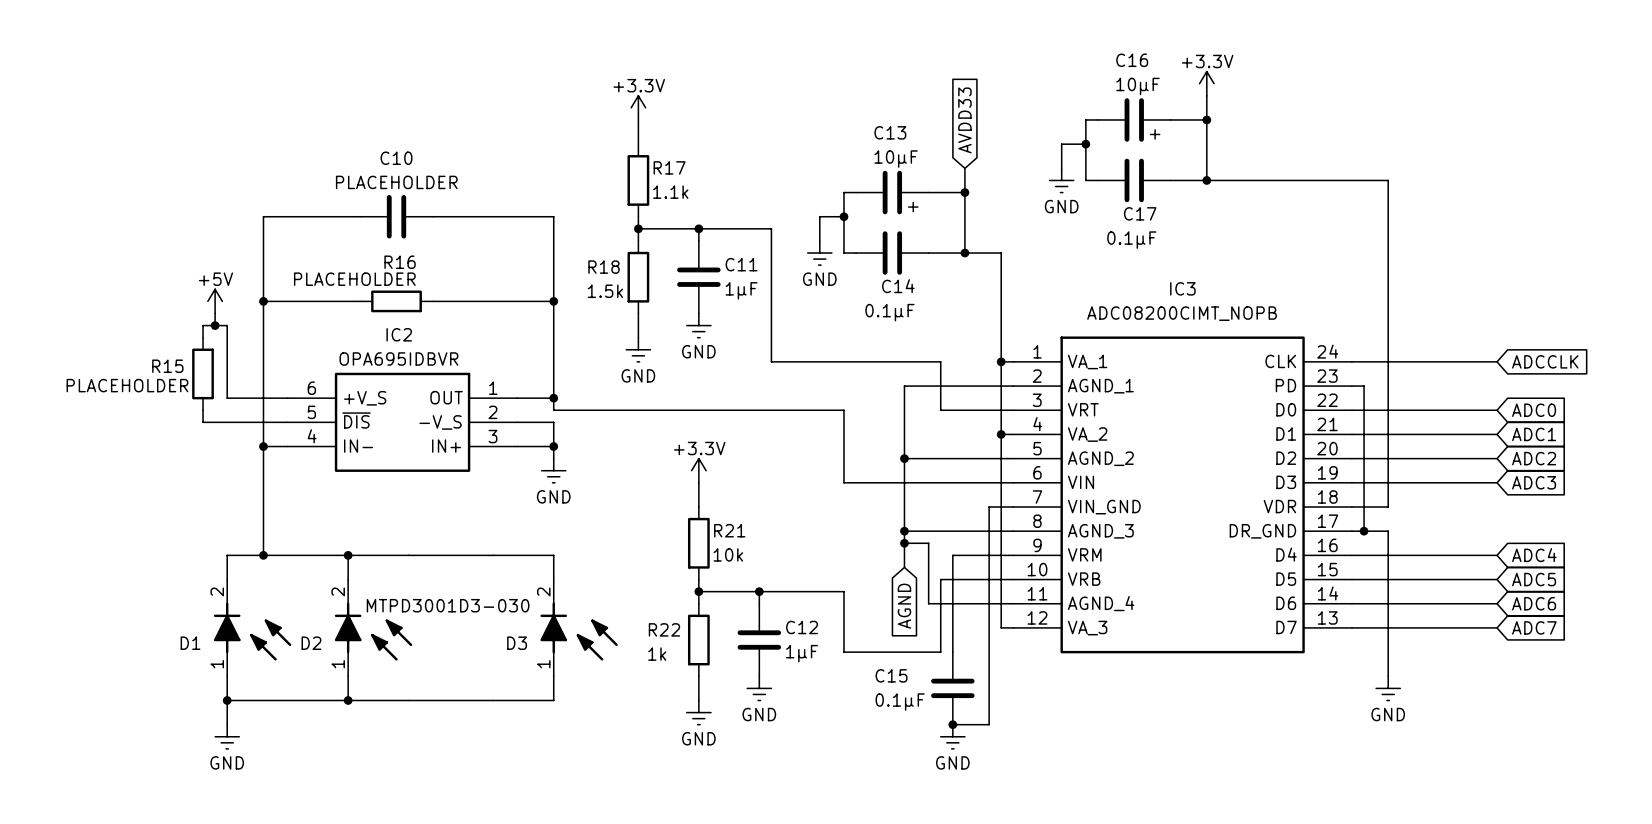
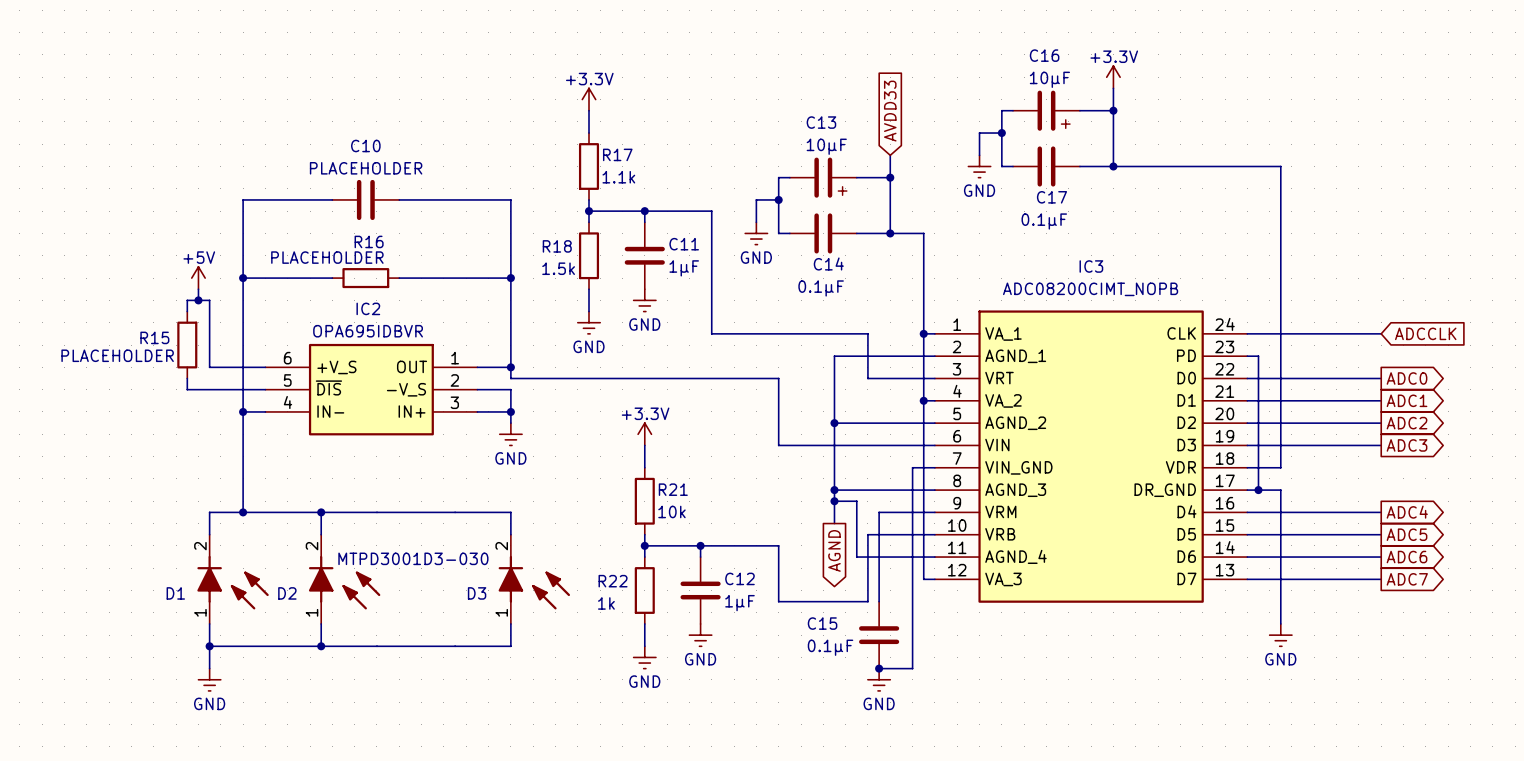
global label shape: input (1534, 410) -> output (1407, 378)
global label shape: input (1534, 434) -> output (1407, 400)
global label shape: input (1534, 458) -> output (1407, 423)
global label shape: input (1534, 482) -> output (1407, 445)
global label shape: input (1534, 555) -> output (1407, 512)
global label shape: input (1534, 579) -> output (1407, 534)
global label shape: input (1534, 603) -> output (1407, 557)
global label shape: input (904, 606) -> output (834, 550)
global label shape: input (1534, 627) -> output (1407, 579)

